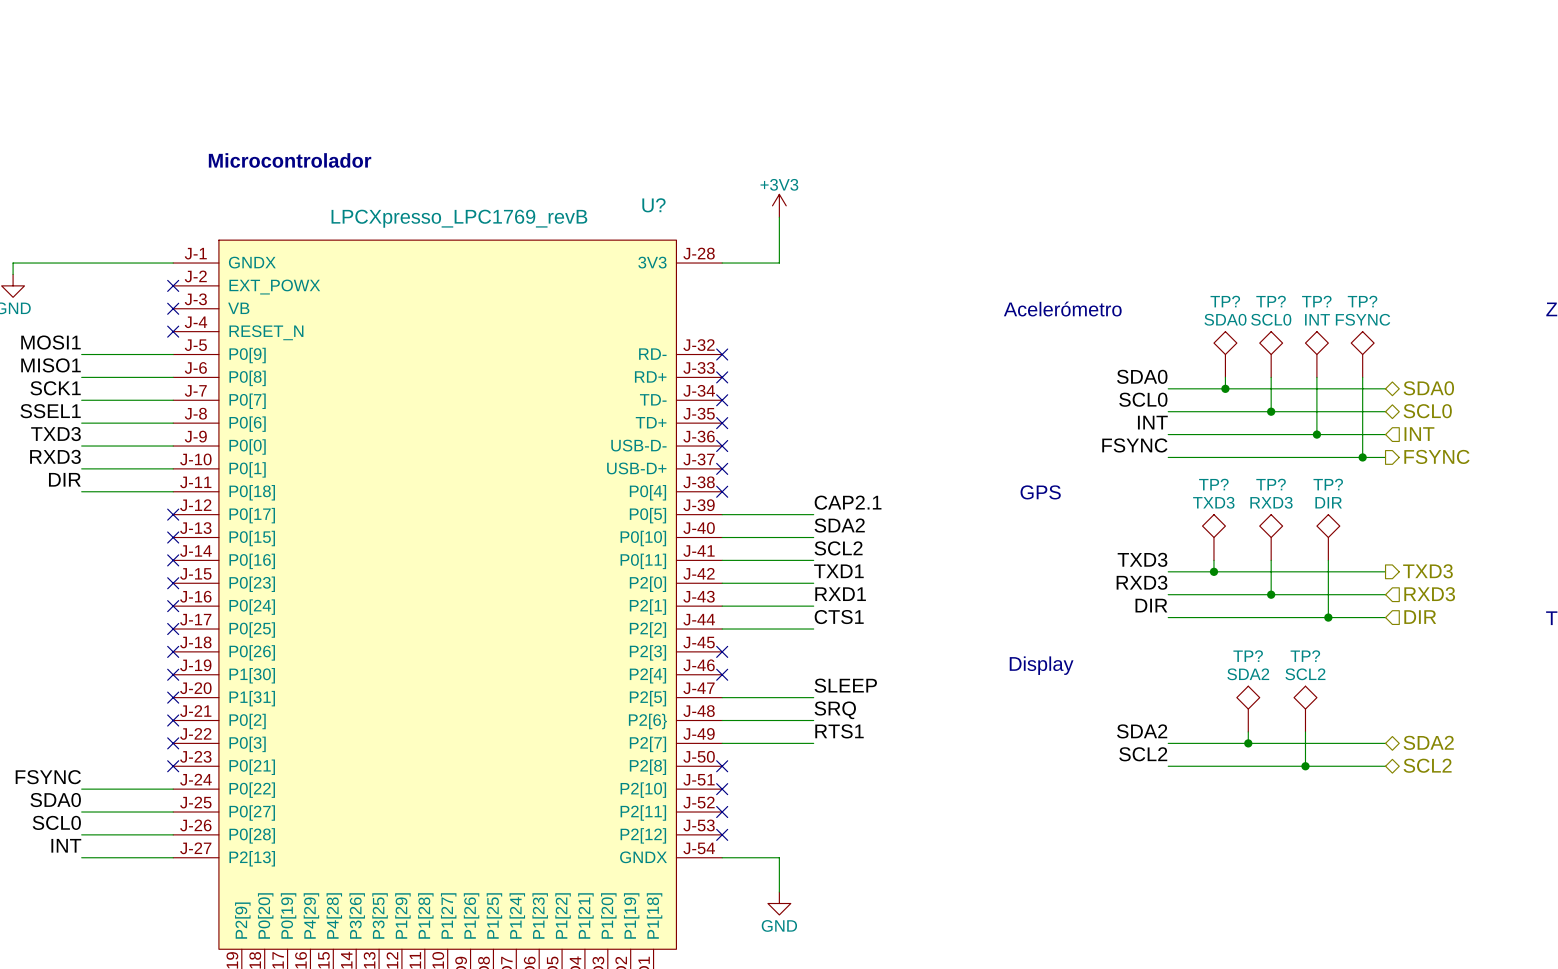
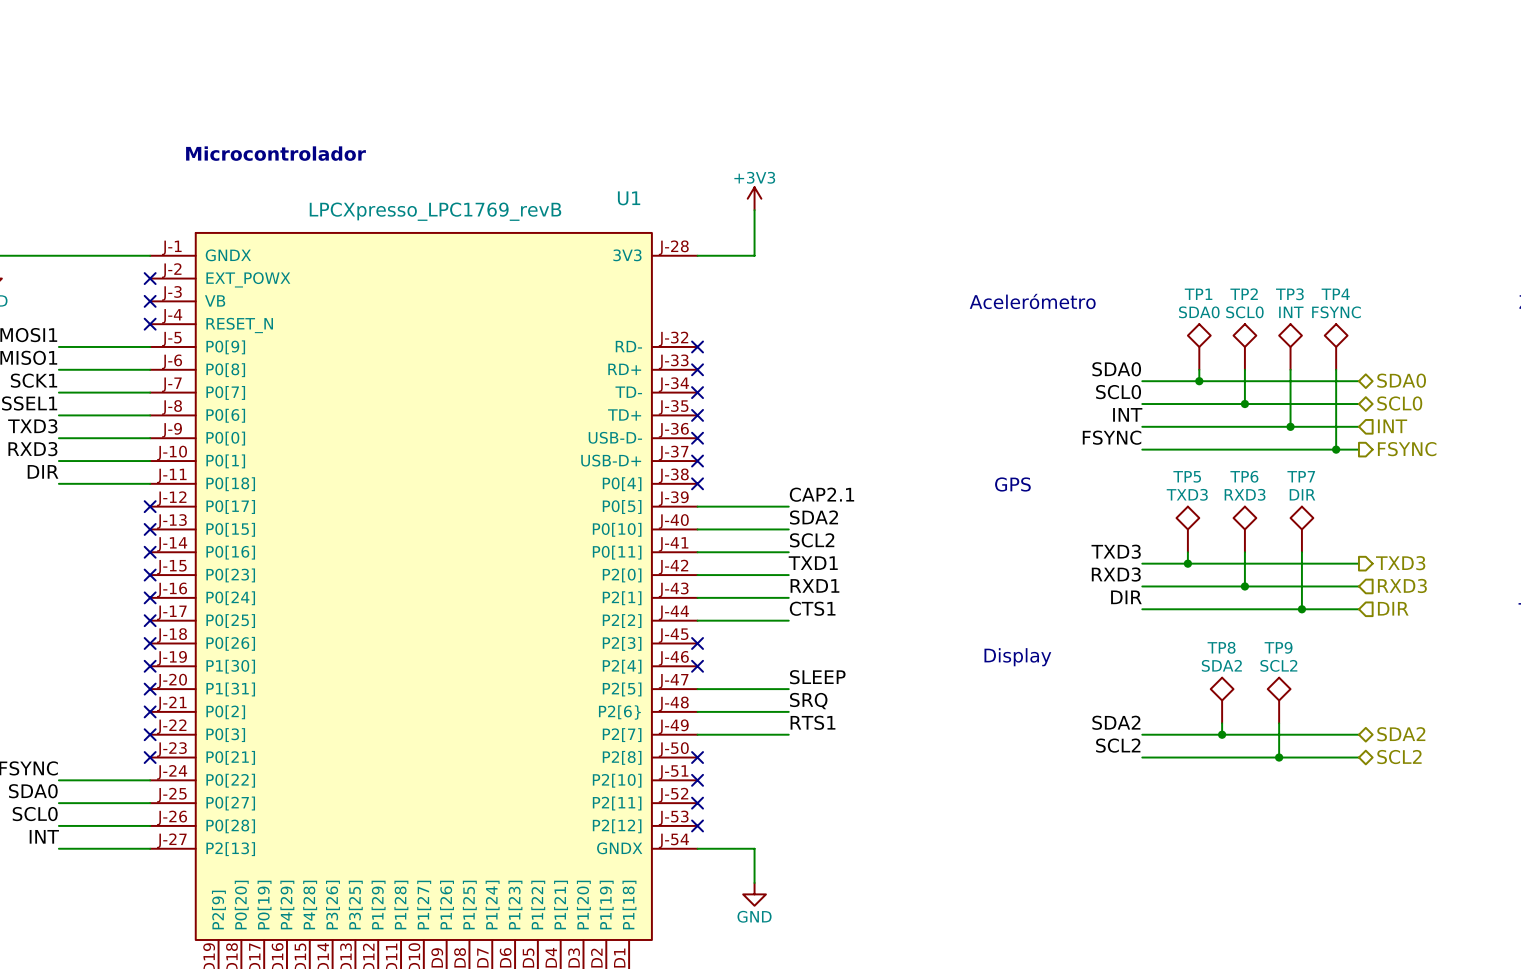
U? name: U? (653, 205) -> U1 (629, 198)
TP? name: TP? (1225, 301) -> TP1 (1198, 294)
TP? name: TP? (1271, 301) -> TP2 (1244, 294)
TP? name: TP? (1316, 301) -> TP3 (1289, 294)
TP? name: TP? (1362, 301) -> TP4 (1335, 294)
TP? name: TP? (1213, 484) -> TP5 (1187, 476)
TP? name: TP? (1271, 484) -> TP6 (1244, 476)
TP? name: TP? (1328, 484) -> TP7 (1301, 476)
TP? name: TP? (1248, 656) -> TP8 (1221, 647)
TP? name: TP? (1305, 656) -> TP9 (1278, 647)

